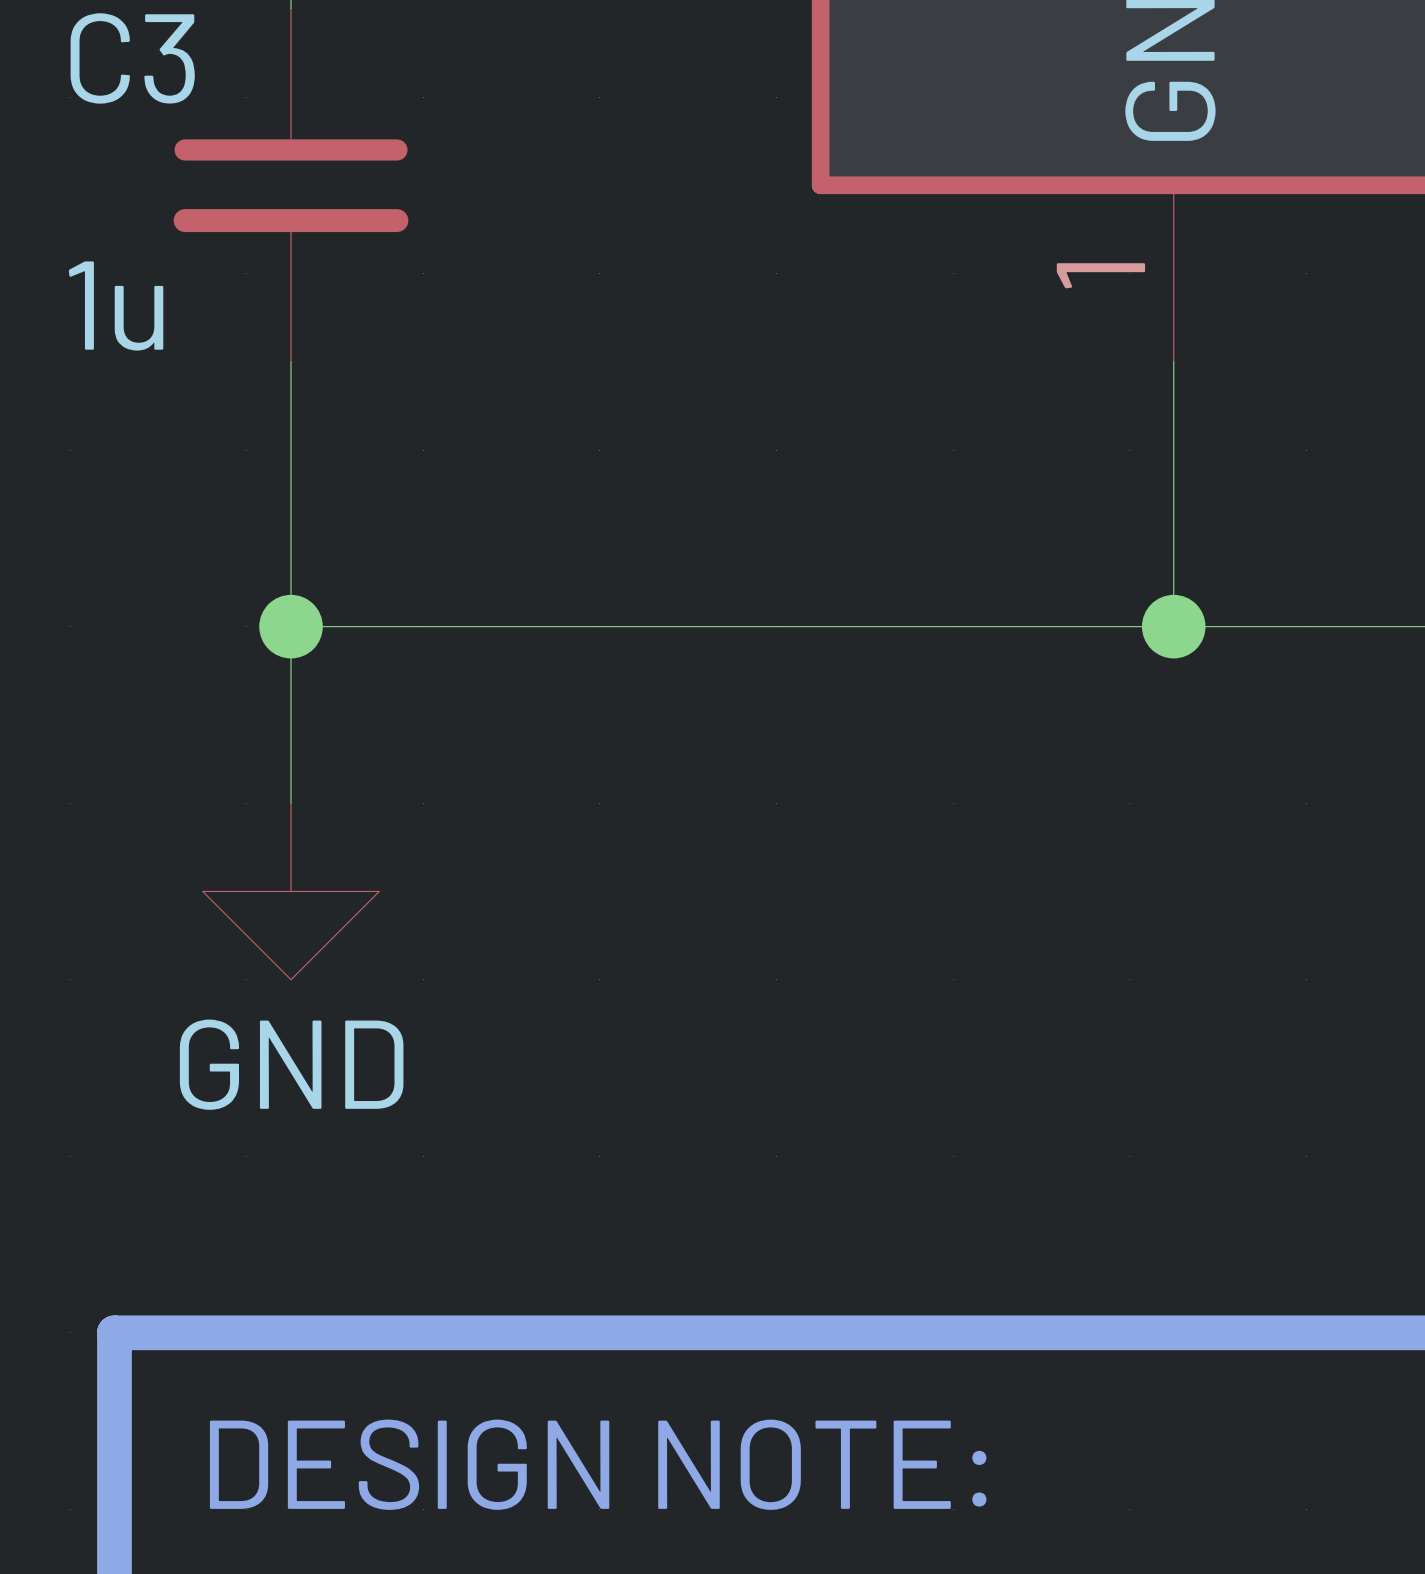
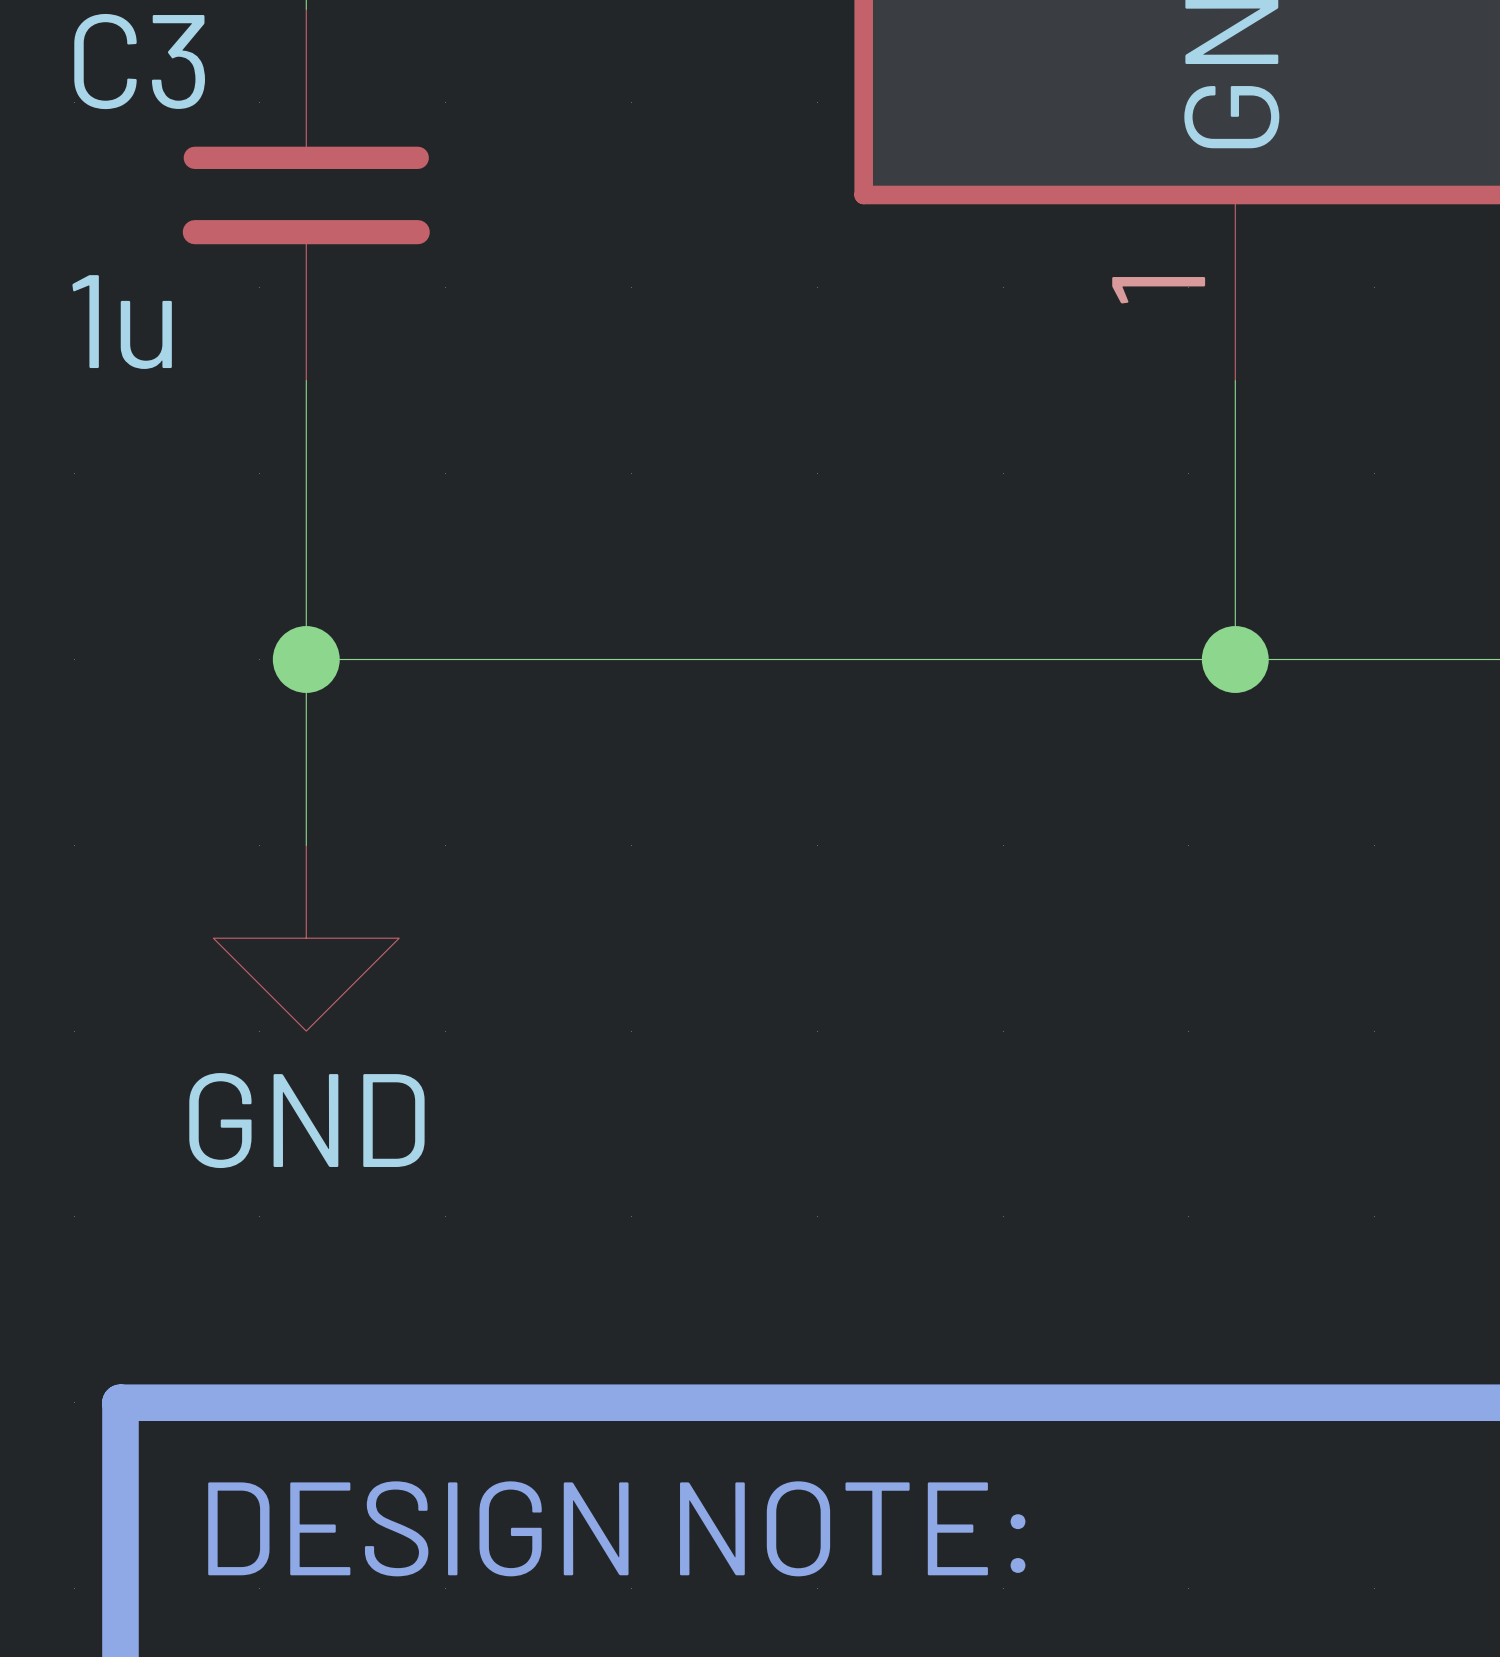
text position: DESIGN NOTE: (598, 1464) -> DESIGN NOTE: (616, 1528)

